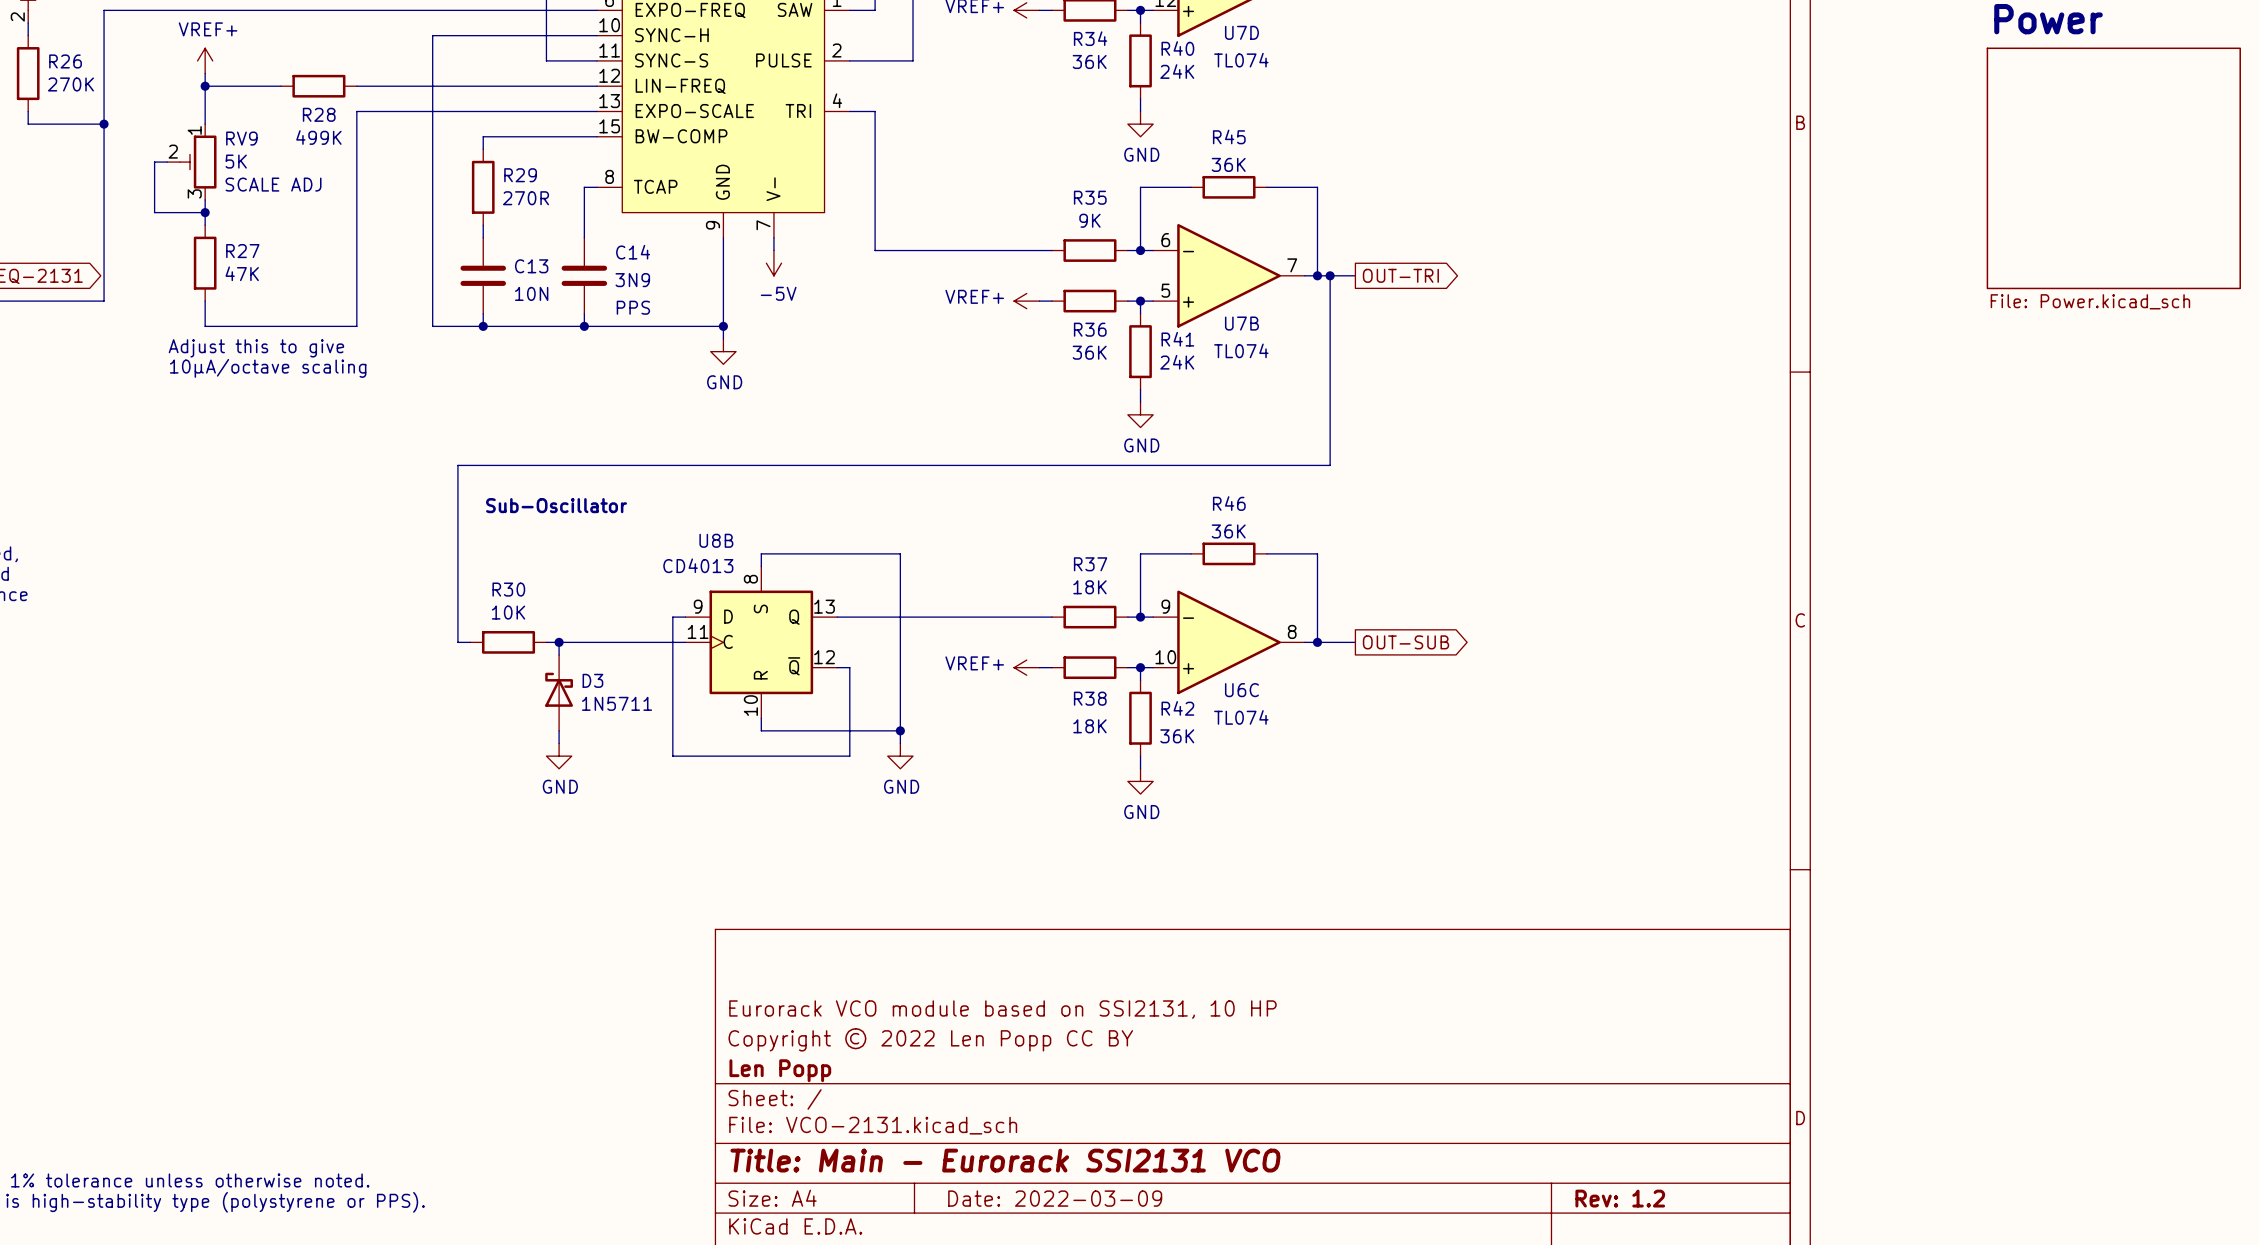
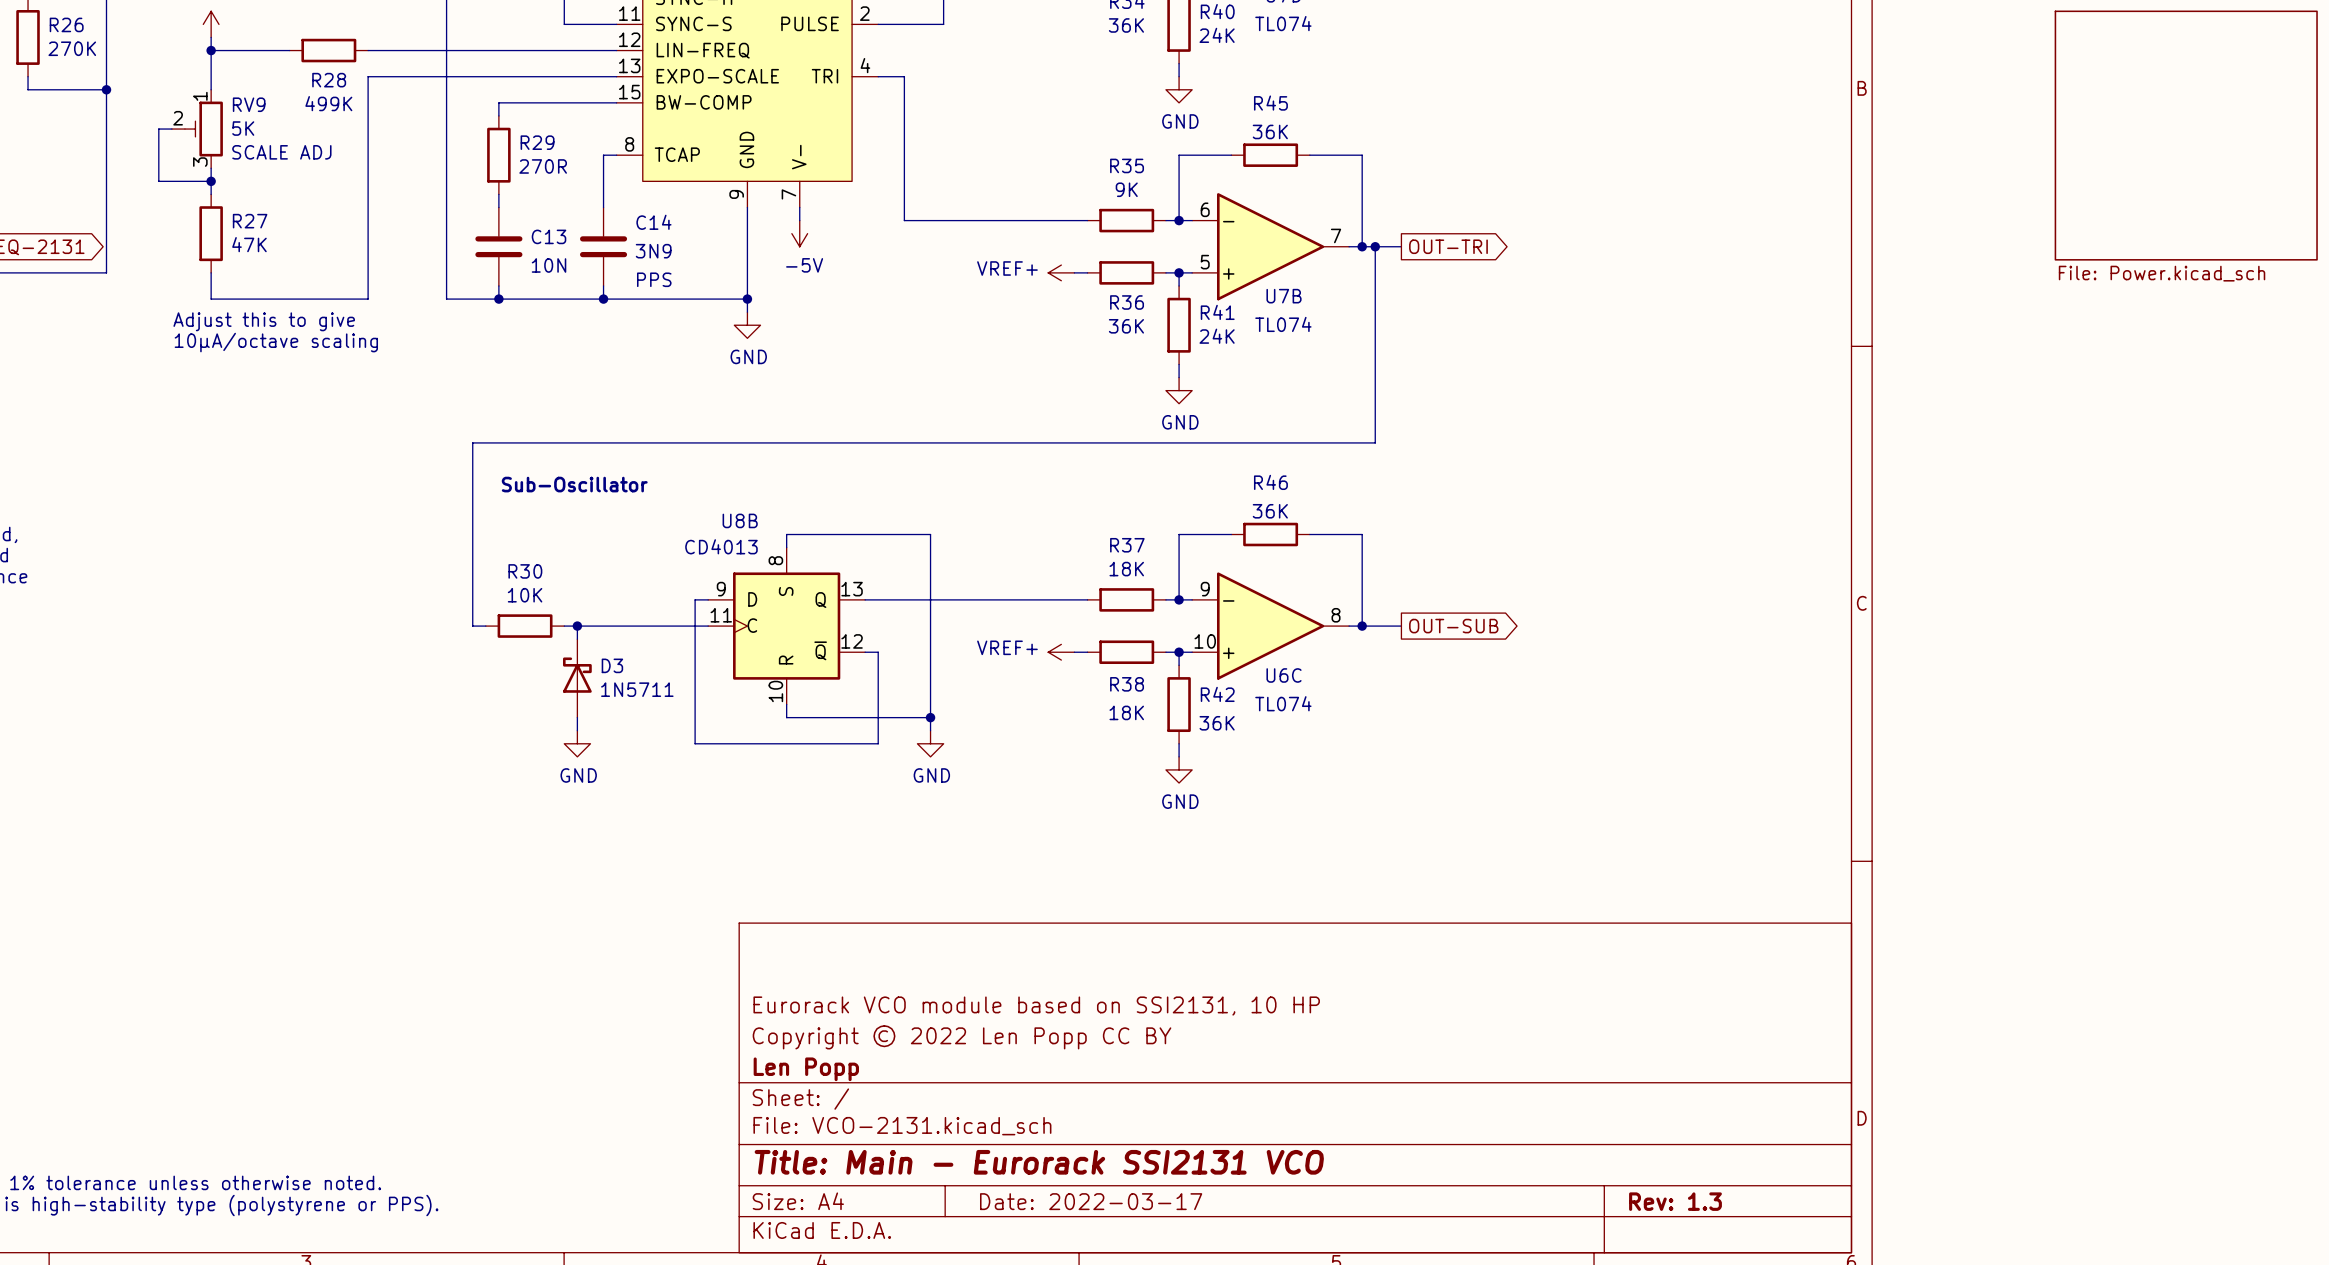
title block: Date: 2022-03-09 (1055, 1198) -> Date: 2022-03-17 (1091, 1201)
title block: Rev: 1.2 (1620, 1198) -> Rev: 1.3 (1675, 1201)

